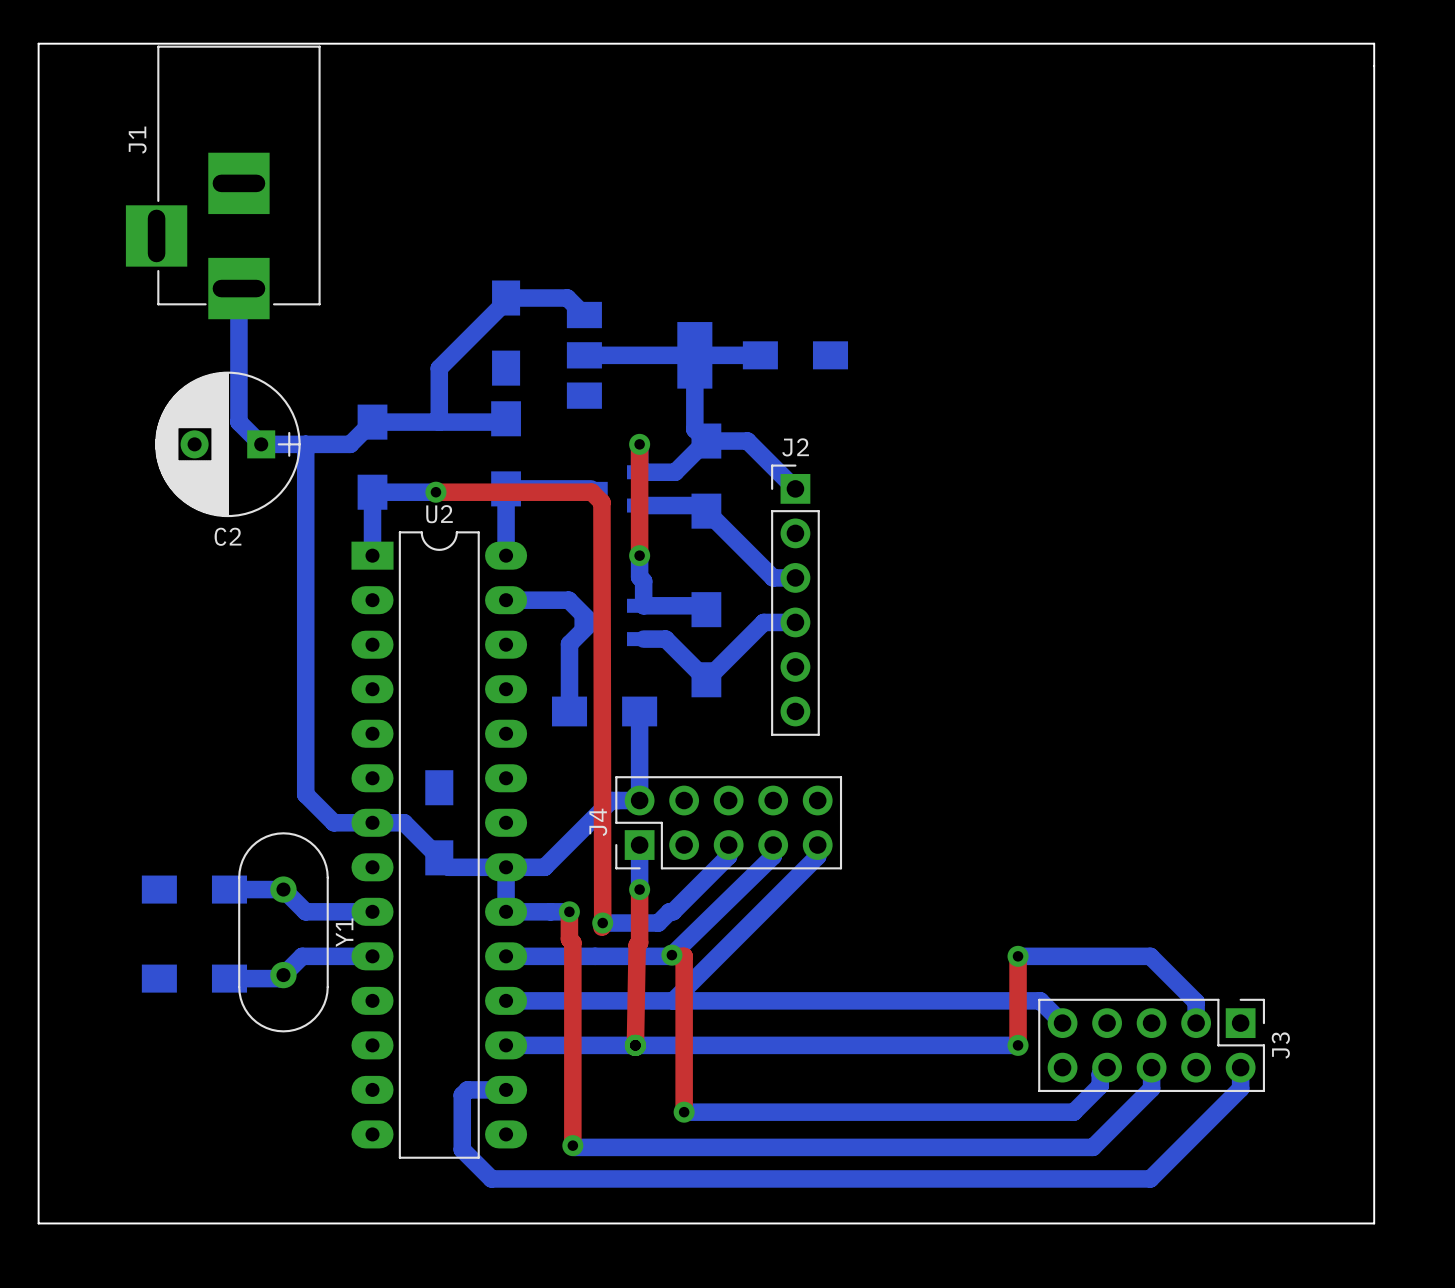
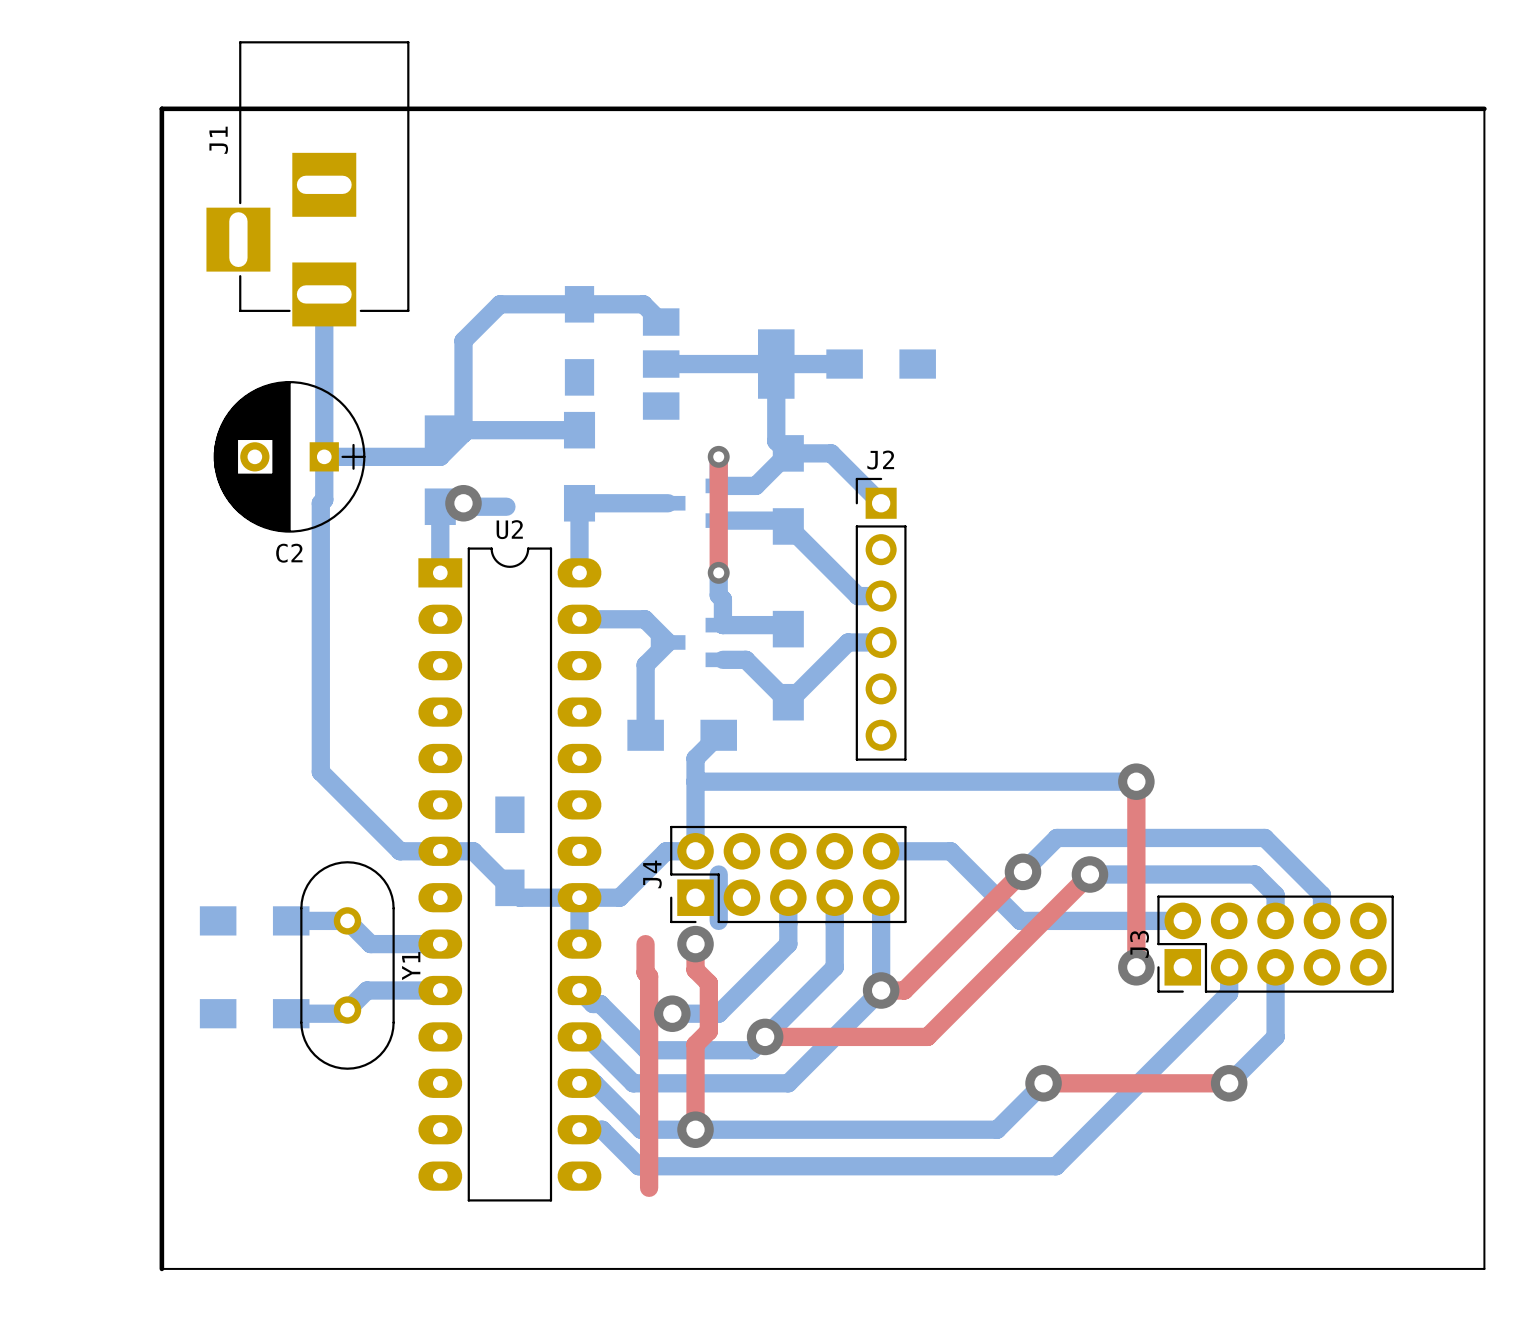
board edge: (1374, 110) (1374, 43) (38, 43) (38, 1223) (105, 1223) -> (1484, 108) (161, 108) (161, 1268)
J1 position: (223, 182) -> (307, 183)
bottom track: (238, 288) (238, 422) (261, 444) -> none
bottom track: (506, 298) (506, 301) (439, 368) (439, 422) -> (579, 304) (500, 304) (463, 340) (463, 433)
bottom track: (506, 418) (502, 422) (372, 422) (350, 444) -> (579, 430) (466, 430) (440, 456) (417, 456)
bottom track: (305, 444) (305, 794) -> (324, 294) (324, 499) (320, 503) (320, 772) (370, 821)
via: none -> (463, 503)
top track: (435, 492) (591, 492) (601, 502) (601, 927) -> none
via: (435, 492) -> none
bottom track: (639, 711) (639, 800) (611, 800) (589, 822) -> (718, 735) (695, 758) (695, 851) (666, 851)
bottom track: none -> (695, 781) (1136, 781)
top track: none -> (1136, 781) (1136, 967)
via: none -> (1136, 781)
J4 footprint: [615, 776, 843, 870] -> [670, 825, 907, 924]
bottom track: none -> (881, 851) (950, 851) (1020, 920) (1182, 920)
bottom track: none -> (1022, 871) (1056, 837) (1264, 837) (1321, 895) (1321, 920)
top track: none -> (1022, 871) (904, 990) (881, 990)
via: none -> (1022, 871)
bottom track: none -> (1089, 874) (1255, 874) (1275, 895) (1275, 920)
top track: none -> (1089, 874) (927, 1036) (765, 1036)
via: none -> (1089, 874)
bottom track: (728, 854) (673, 911) (669, 911) (658, 923) (602, 923) -> none
bottom track: (773, 854) (671, 955) (673, 956) (506, 956) -> (834, 897) (834, 967) (751, 1050) (646, 1050) (600, 1004) (593, 1004) (579, 990)
bottom track: (817, 854) (673, 1000) -> none
bottom track: none -> (788, 897) (788, 944) (718, 1013) (672, 1013)
top track: (639, 889) (635, 1045) (637, 1045) -> none
via: (639, 889) -> none
bottom track: (506, 911) (569, 911) -> none
via: (569, 911) -> none
top track: none -> (695, 944) (695, 969) (708, 983) (708, 1031) (695, 1044) (695, 1129)
via: none -> (695, 944)
via: (602, 923) -> none
via: none -> (1136, 967)
bottom track: none -> (1275, 967) (1275, 1036) (1229, 1083)
top track: (671, 955) (684, 956) (684, 1112) -> none
via: (671, 955) -> none
via: none -> (881, 990)
bottom track: (1018, 956) (1150, 956) (1196, 1002) (1196, 1023) -> none
top track: (1018, 956) (1018, 1045) -> none
via: (1018, 956) -> none
via: none -> (672, 1013)
J3 footprint: [1038, 998, 1266, 1093] -> [1157, 895, 1394, 993]
bottom track: (513, 1000) (1040, 1000) (1062, 1023) -> none
via: none -> (765, 1036)
bottom track: (520, 1045) (557, 1045) -> (586, 1036) (633, 1083)
bottom track: none -> (594, 1083) (640, 1129) (997, 1129) (1043, 1083)
via: (635, 1045) -> none
bottom track: (706, 1045) (1018, 1045) -> (788, 1083) (881, 990) (881, 897)
top track: none -> (1043, 1083) (1229, 1083)
via: none -> (1043, 1083)
via: (1018, 1045) -> none
via: none -> (1229, 1083)
J3 name position: J3 (1280, 1045) -> J3 (1139, 944)
bottom track: (1107, 1067) (1100, 1074) (1100, 1085) (1073, 1112) (684, 1112) -> none
bottom track: (1151, 1067) (1151, 1088) (1092, 1147) (574, 1147) (572, 1145) -> none
bottom track: (1240, 1067) (1240, 1088) (1150, 1178) (491, 1178) (462, 1149) (462, 1095) (467, 1089) (506, 1089) -> (1229, 967) (1229, 993) (1056, 1166) (638, 1166) (602, 1129) (579, 1129)
via: none -> (695, 1129)
via: (684, 1112) -> none
via: (572, 1145) -> none

